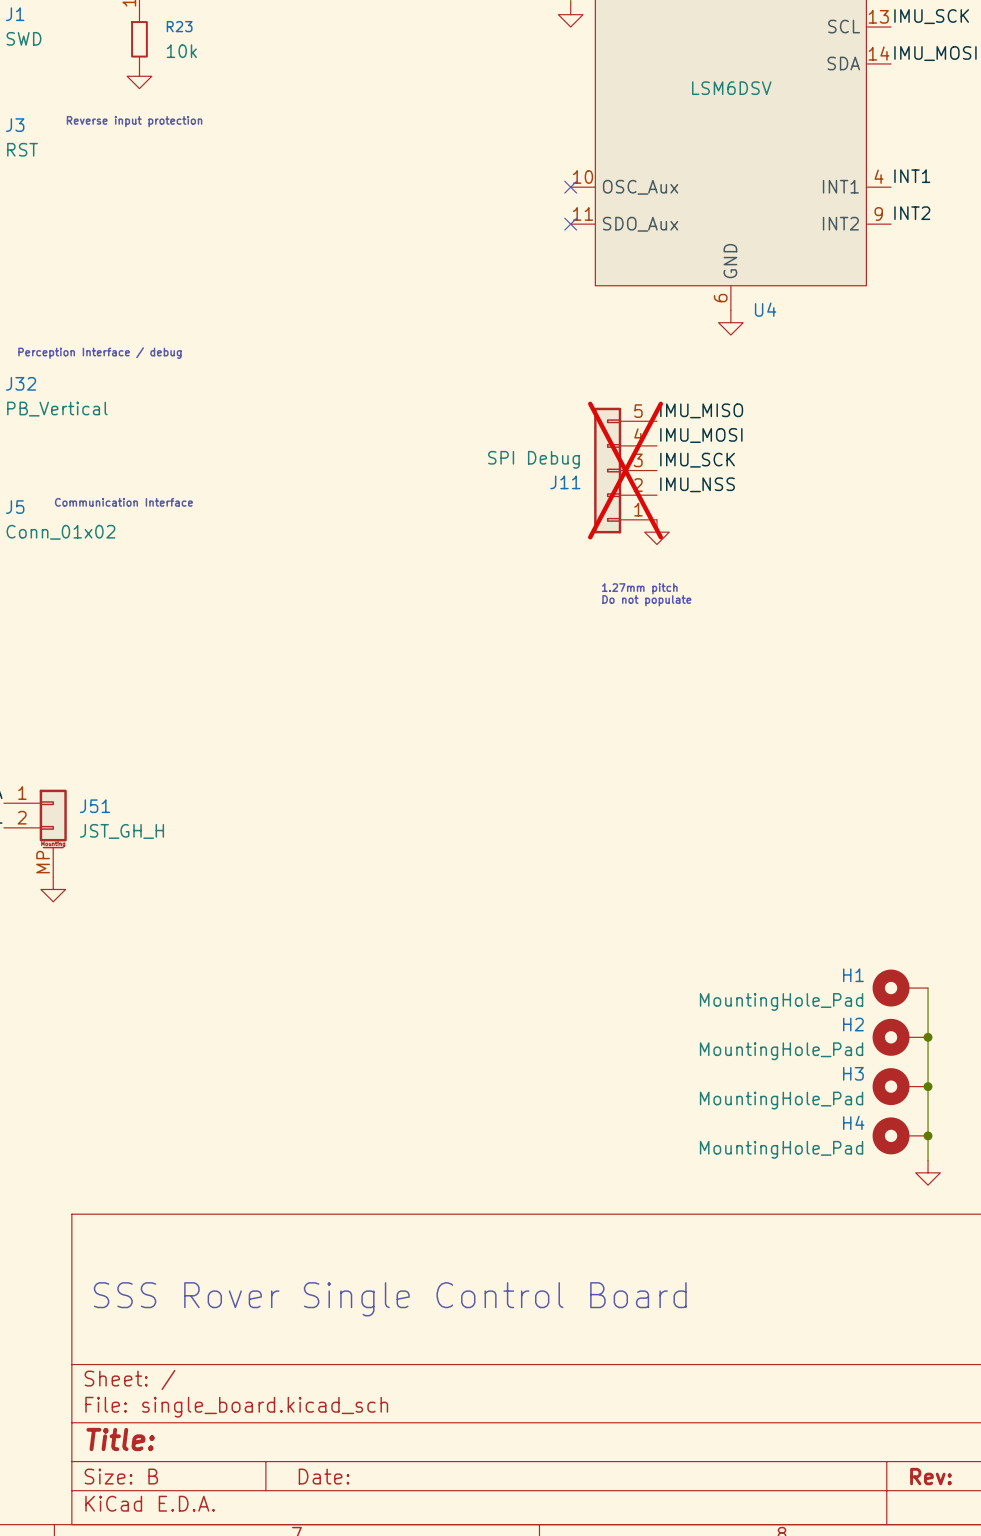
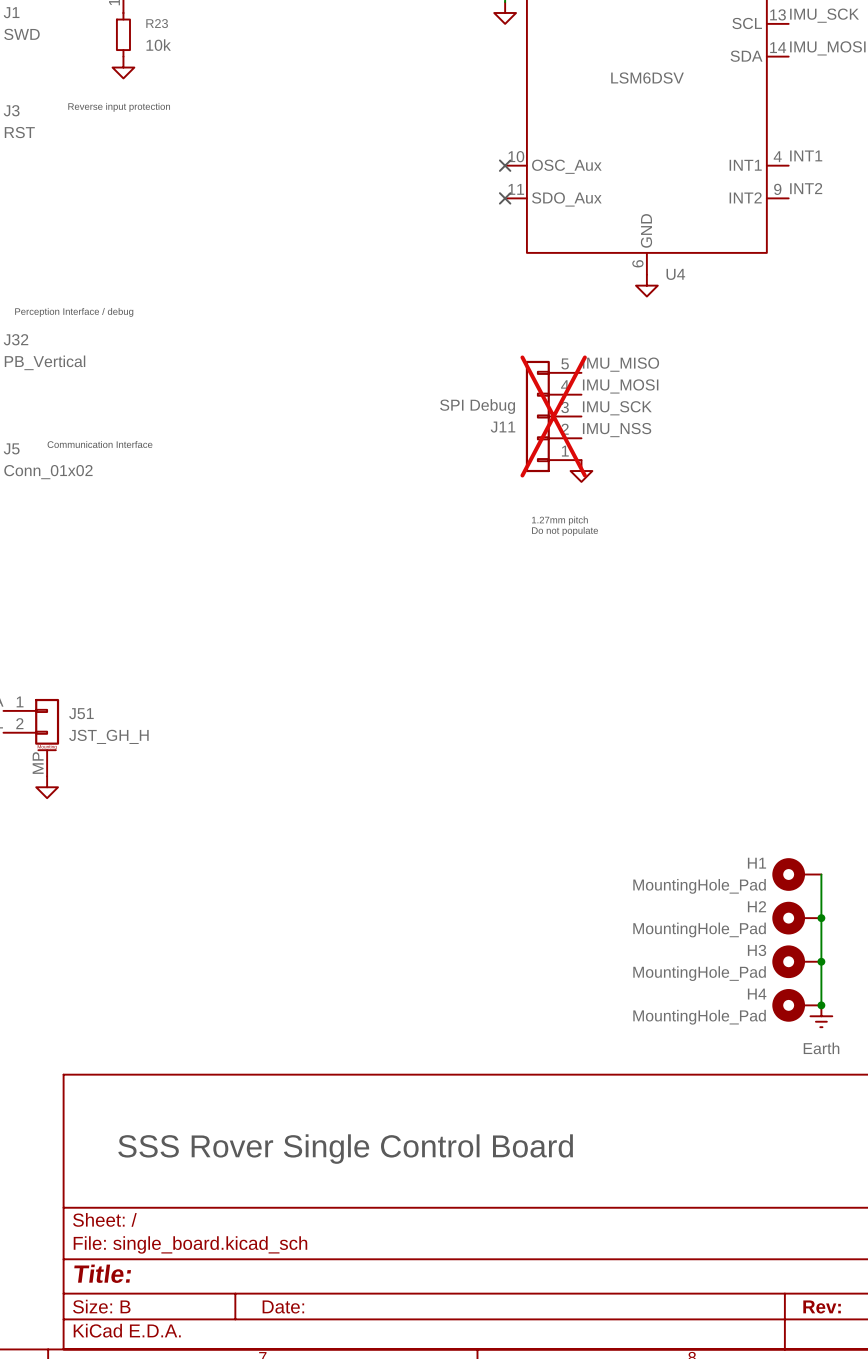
power symbol: none -> Earth (821, 1016)
power symbol: (928, 1172) -> none

